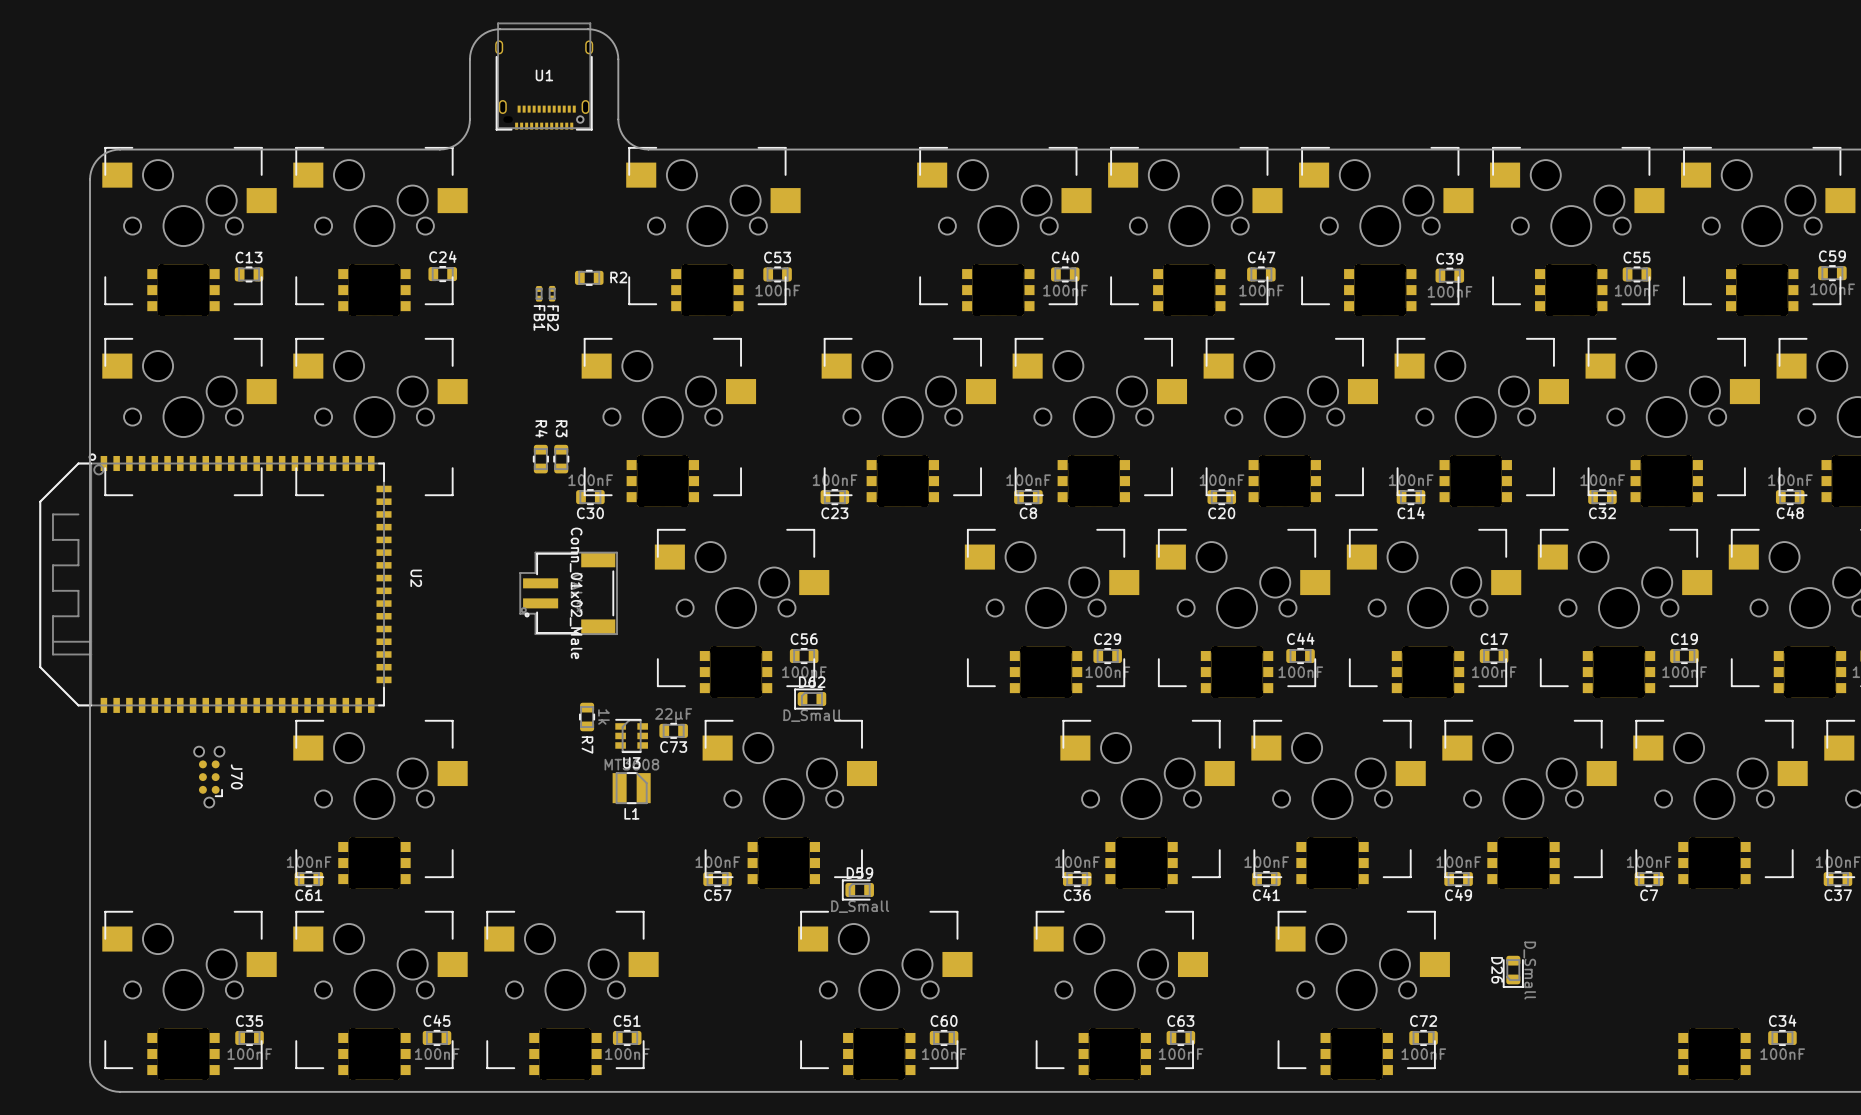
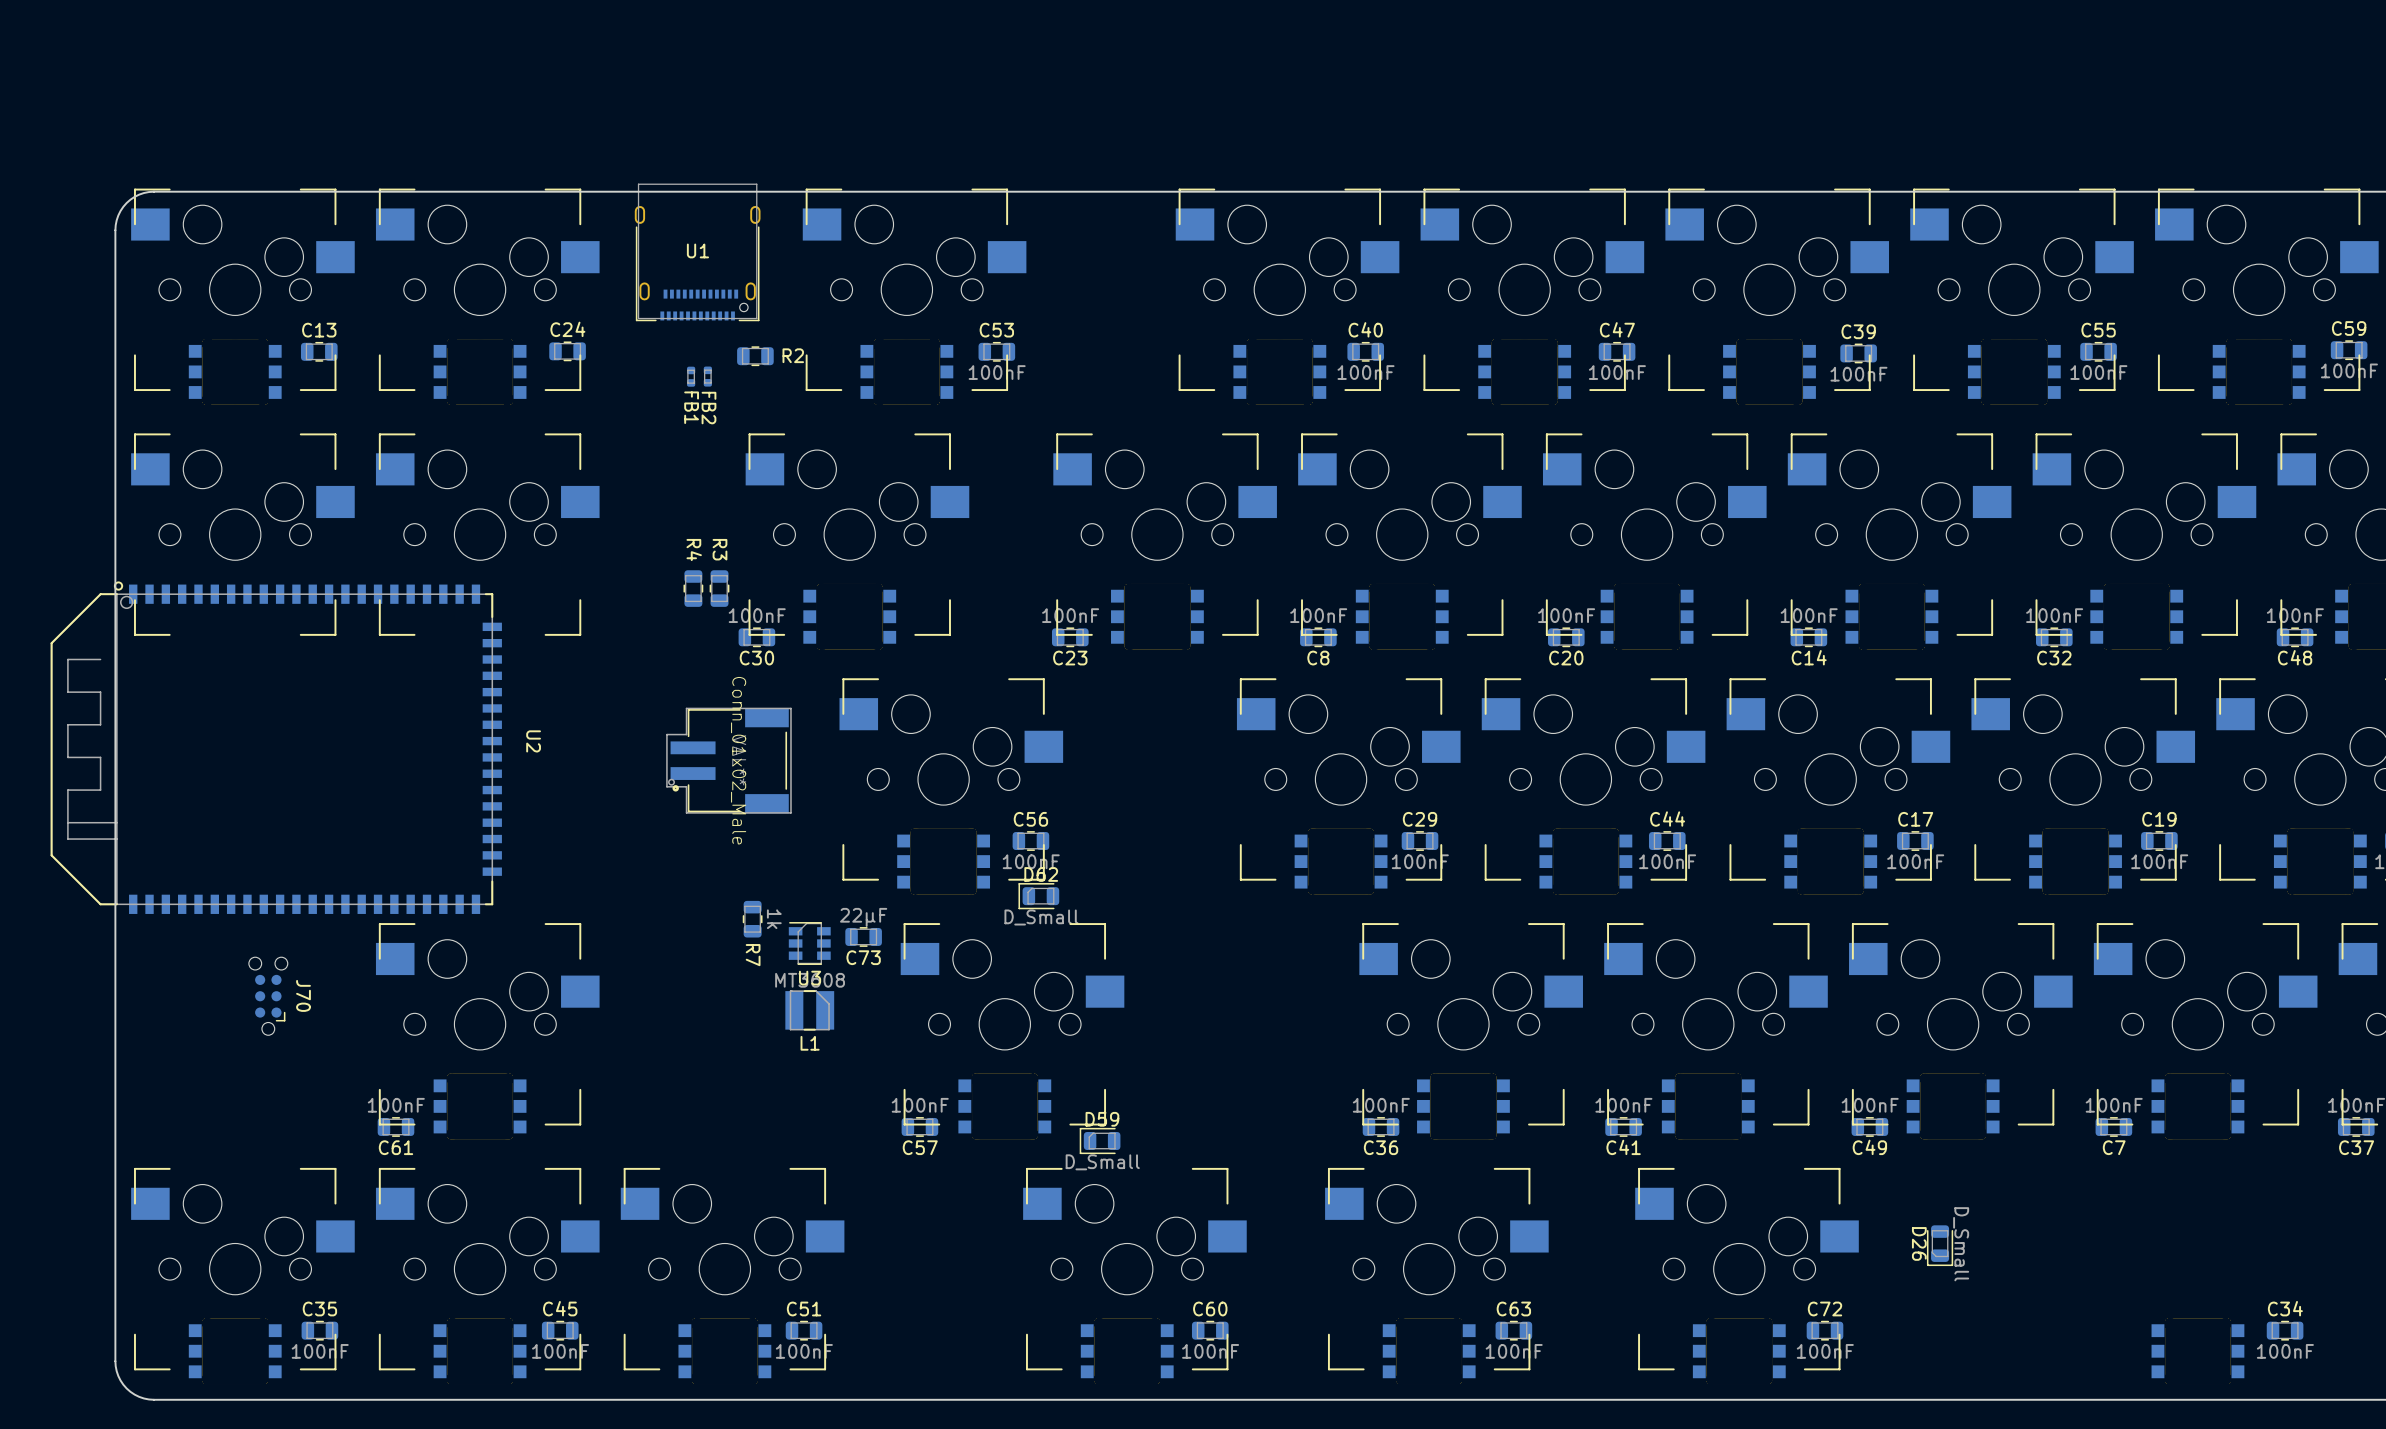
U1 position: (544, 76) -> (697, 252)
board edge: (648, 149) (633, 145) (622, 134) (618, 119) (617, 51) (612, 41) (606, 35) (596, 30) (588, 29) (500, 29) (492, 30) (481, 35) (473, 44) (470, 55) (469, 119) (467, 130) (458, 143) (447, 148) (439, 149) -> (831, 191) (563, 191)

